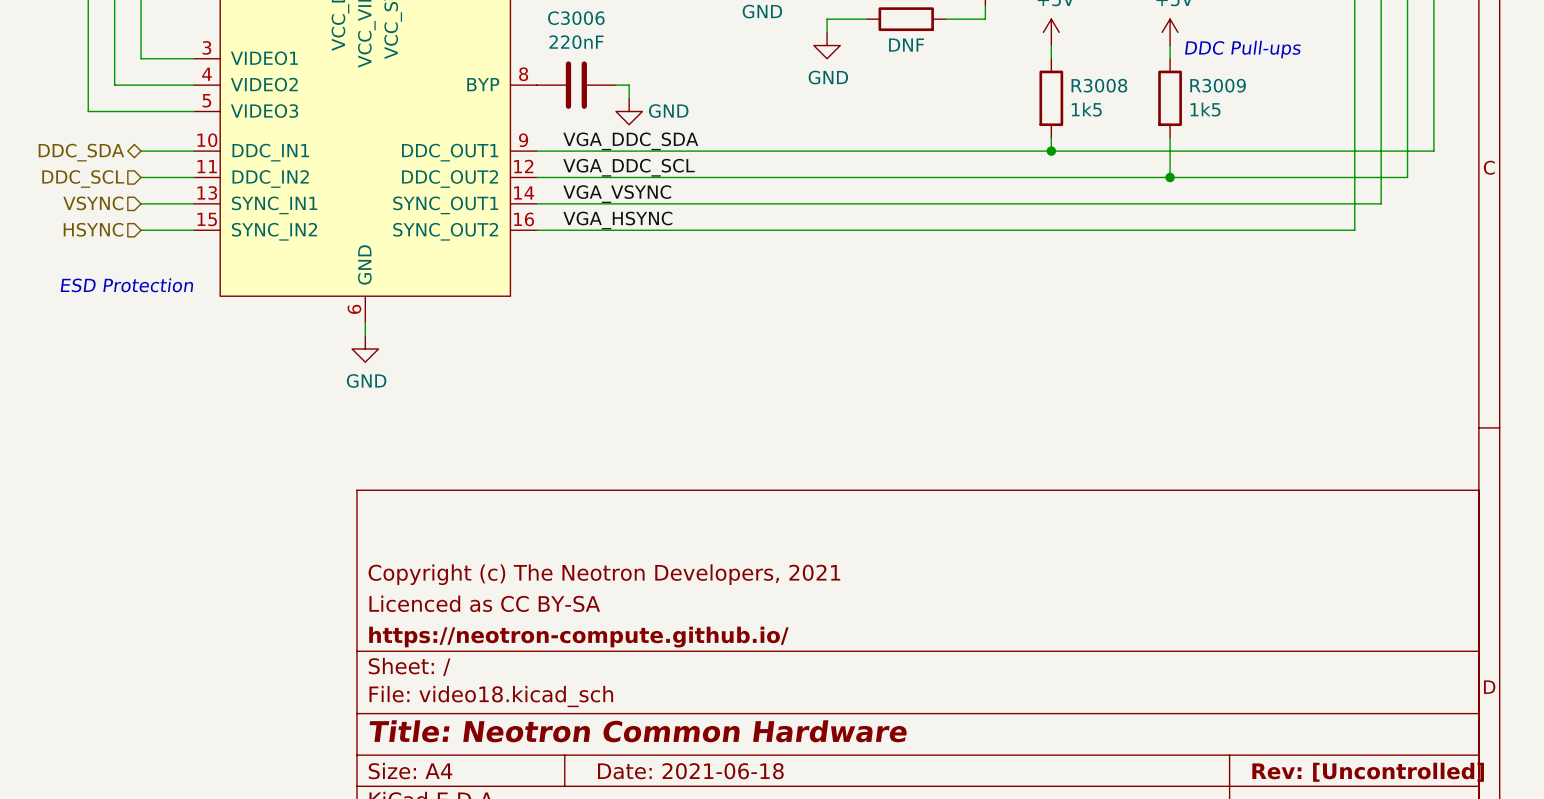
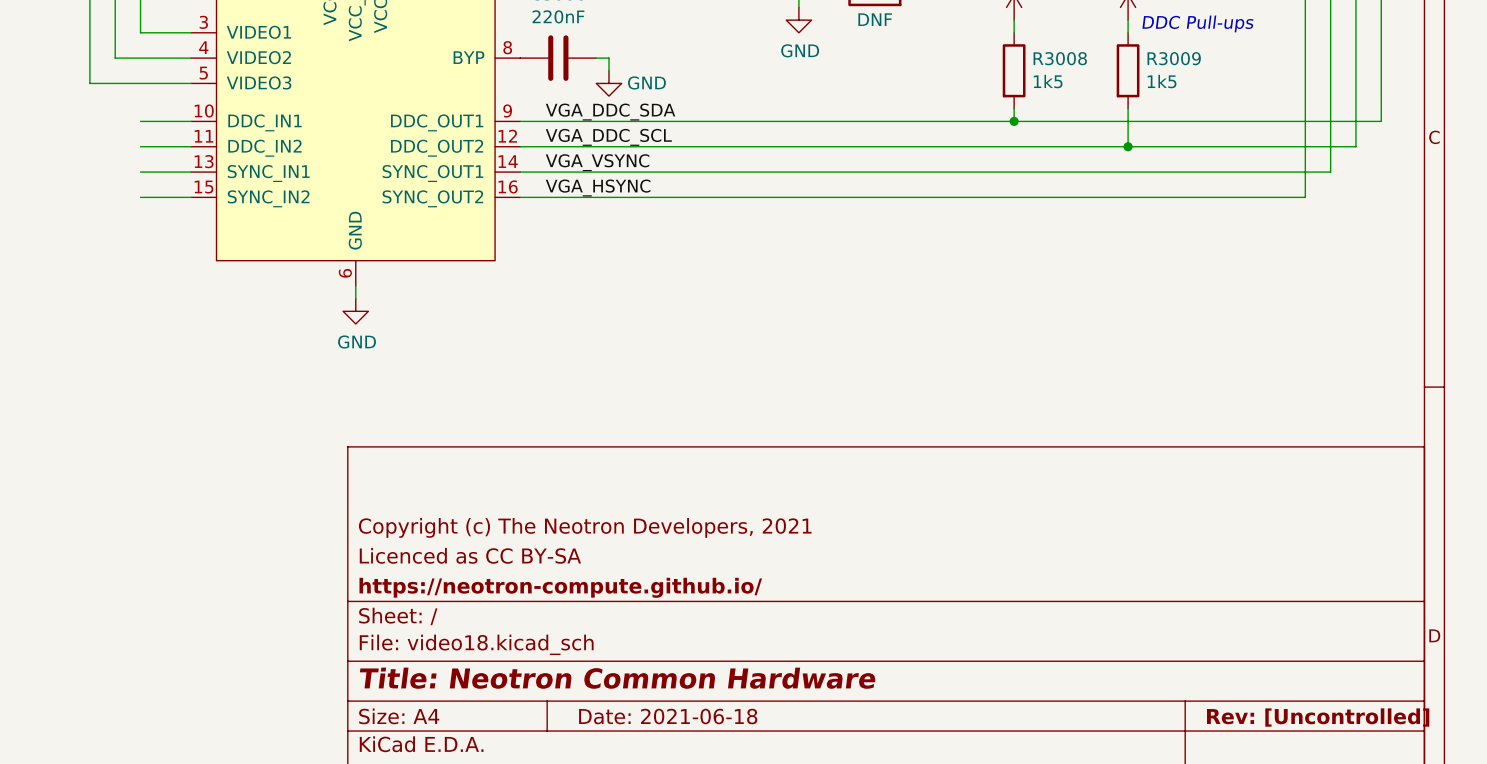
hierarchical label: DDC_SDA (81, 152) -> none
hierarchical label: DDC_SCL (83, 179) -> none
hierarchical label: VSYNC (93, 203) -> none
hierarchical label: HSYNC (93, 229) -> none
text: ESD Protection (126, 285) -> none

